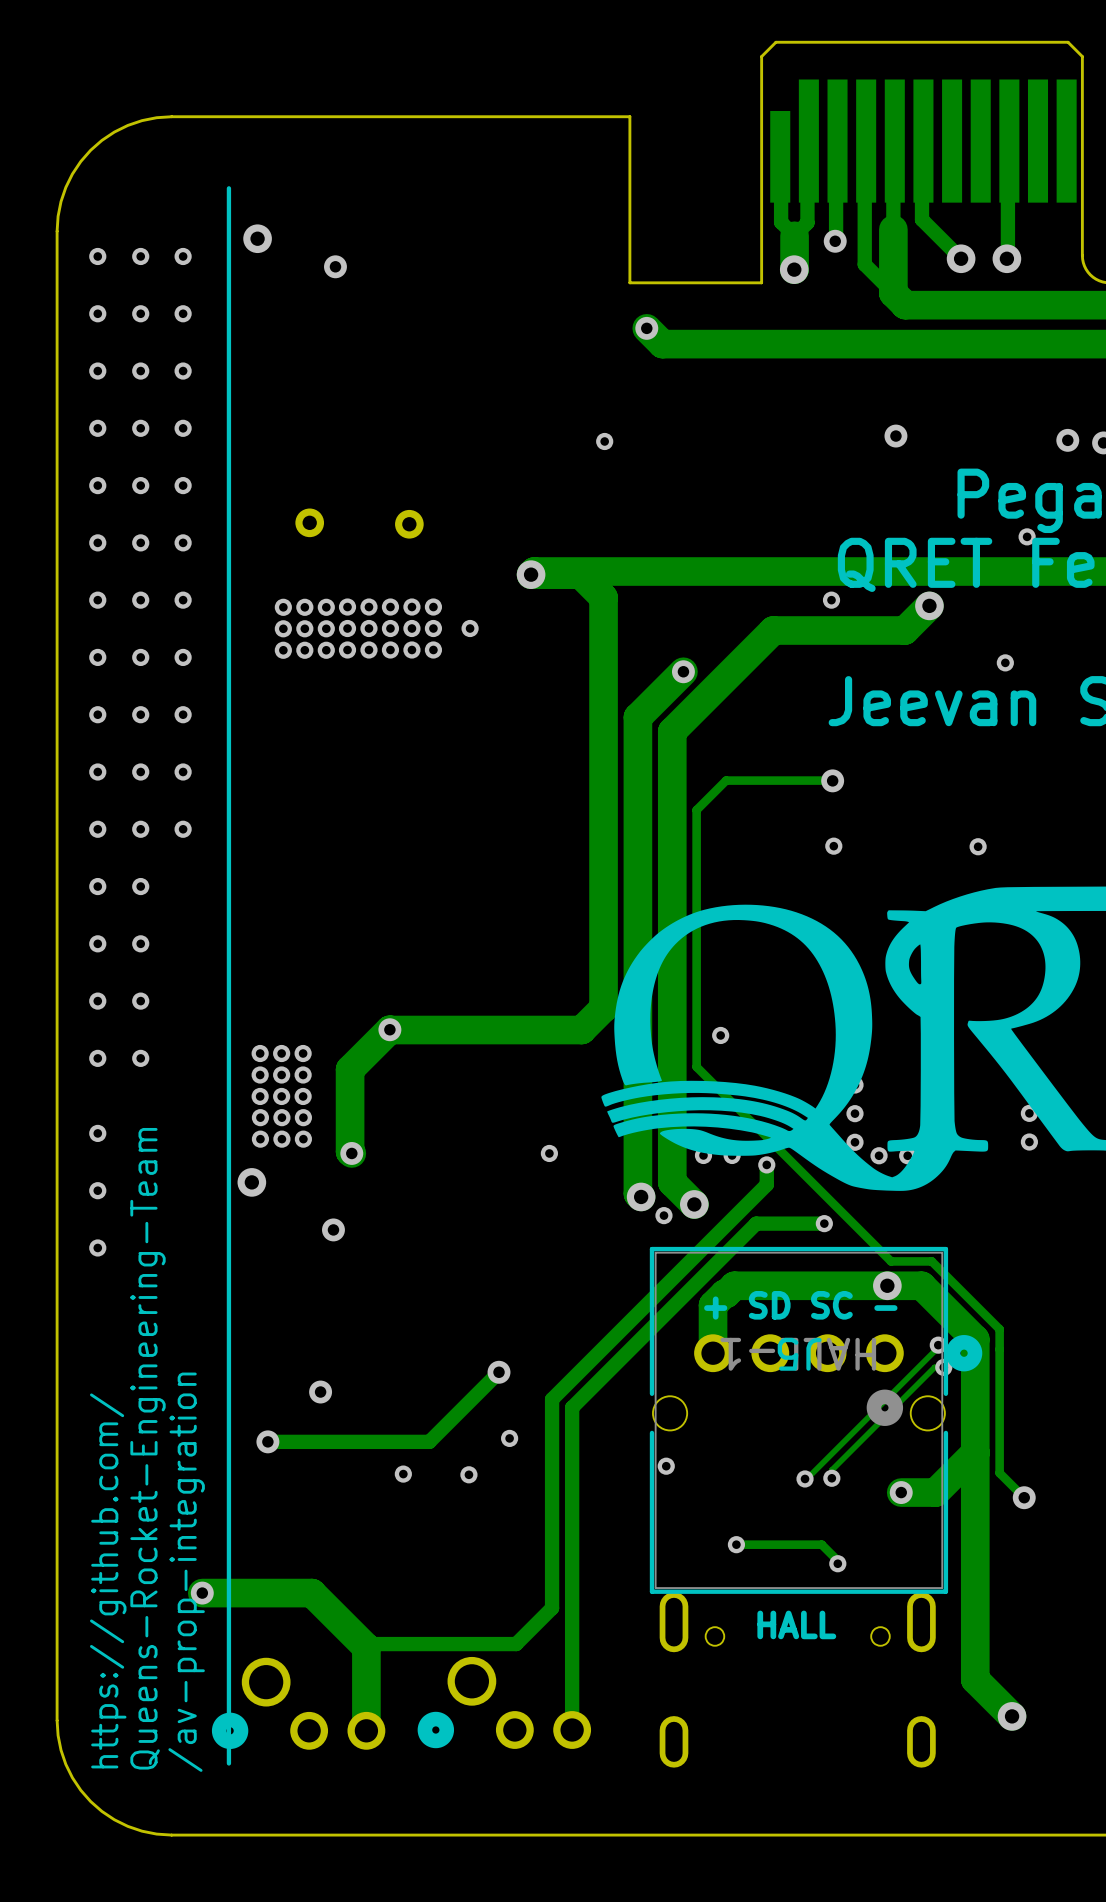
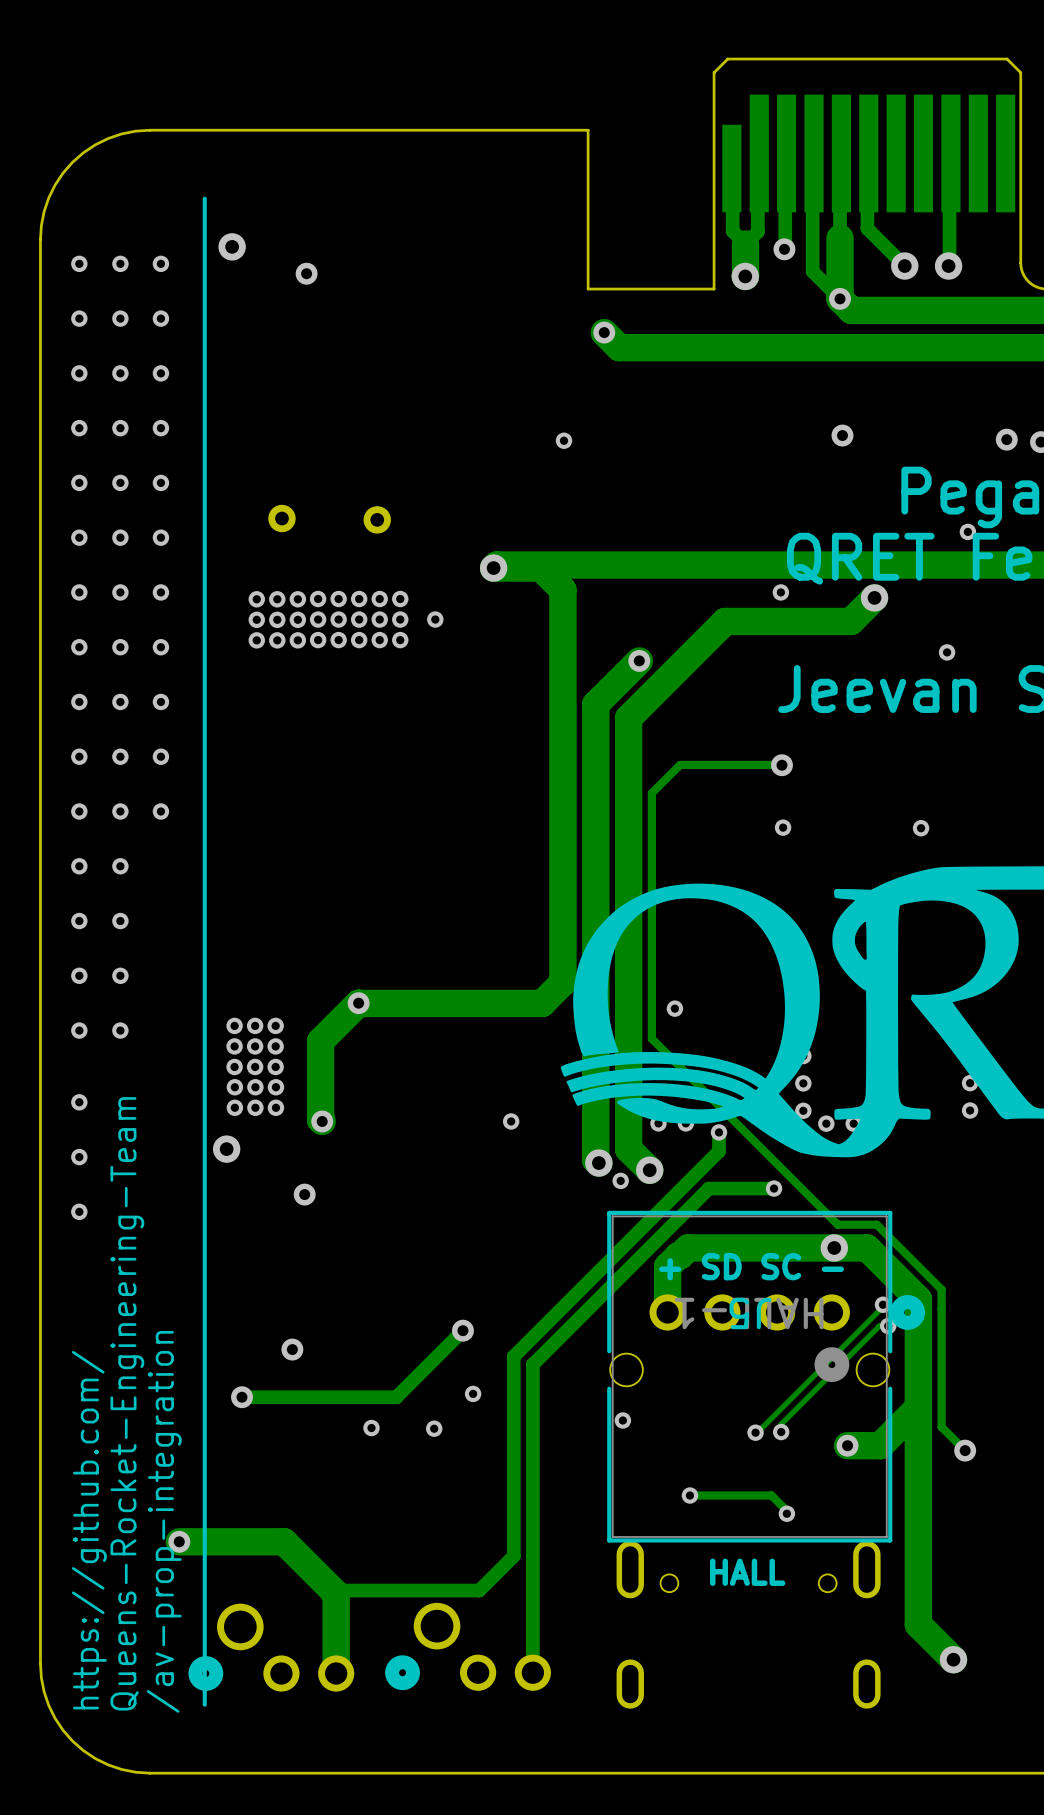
via: none -> (840, 298)

